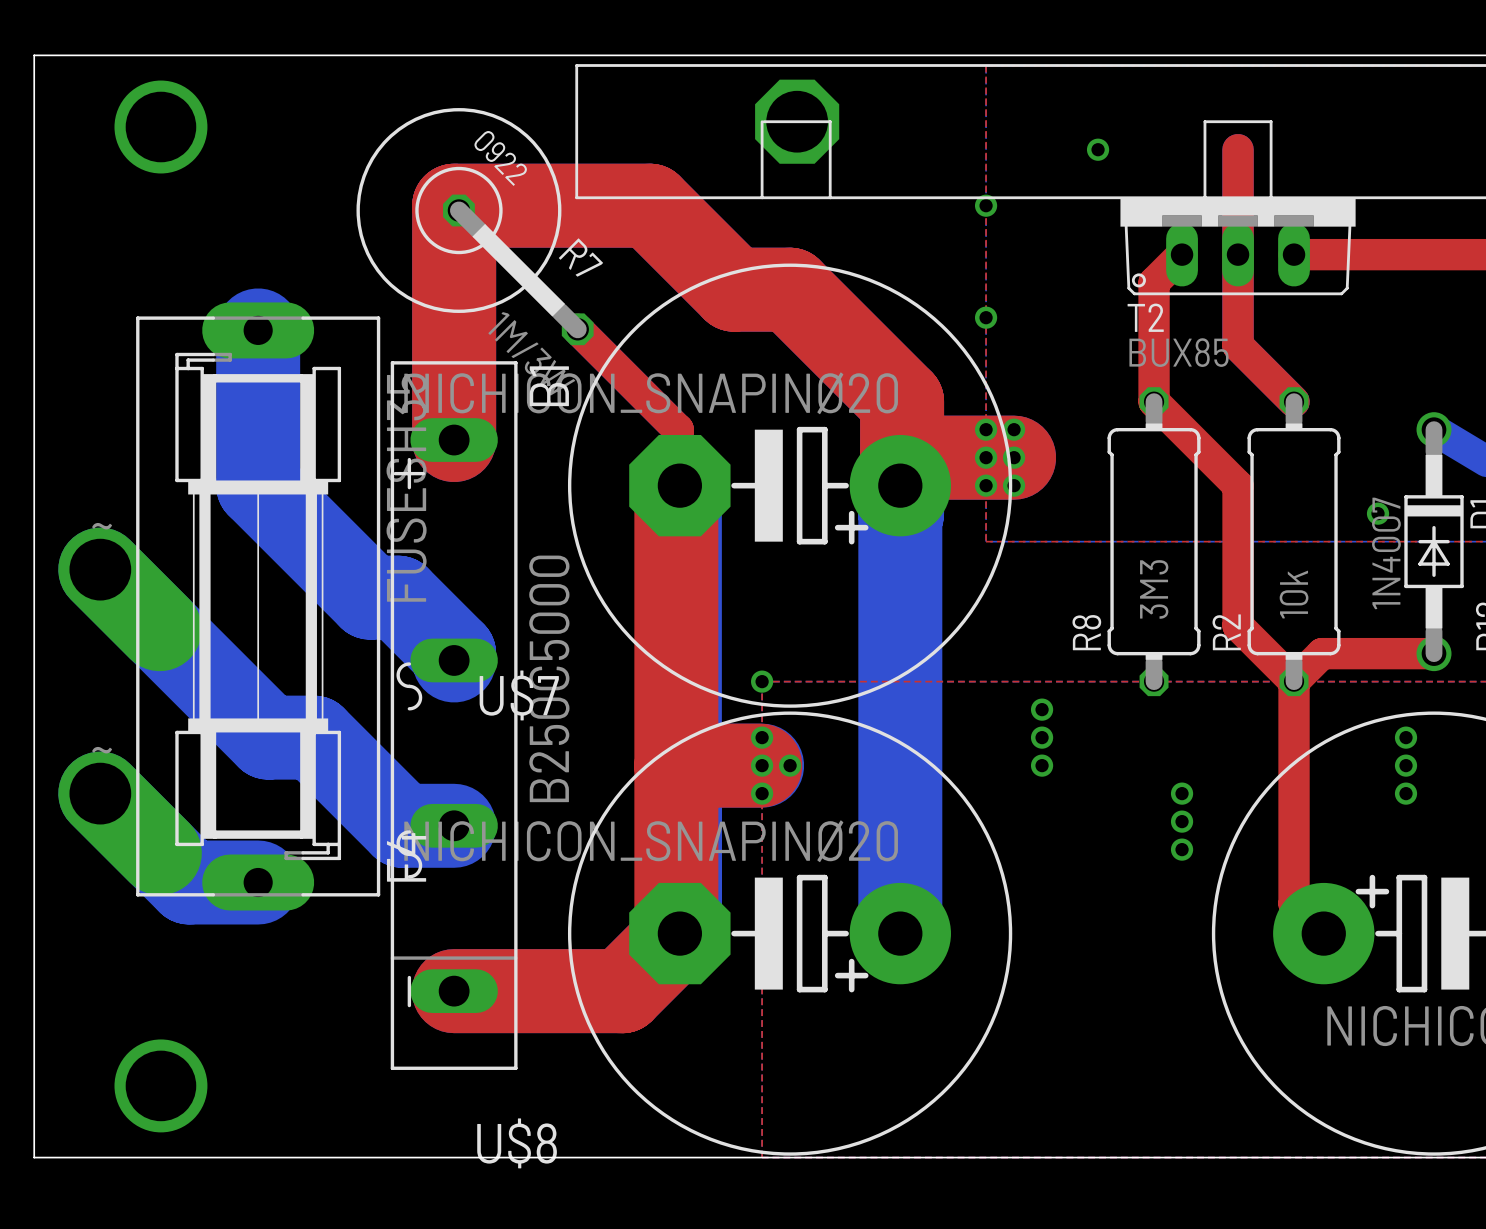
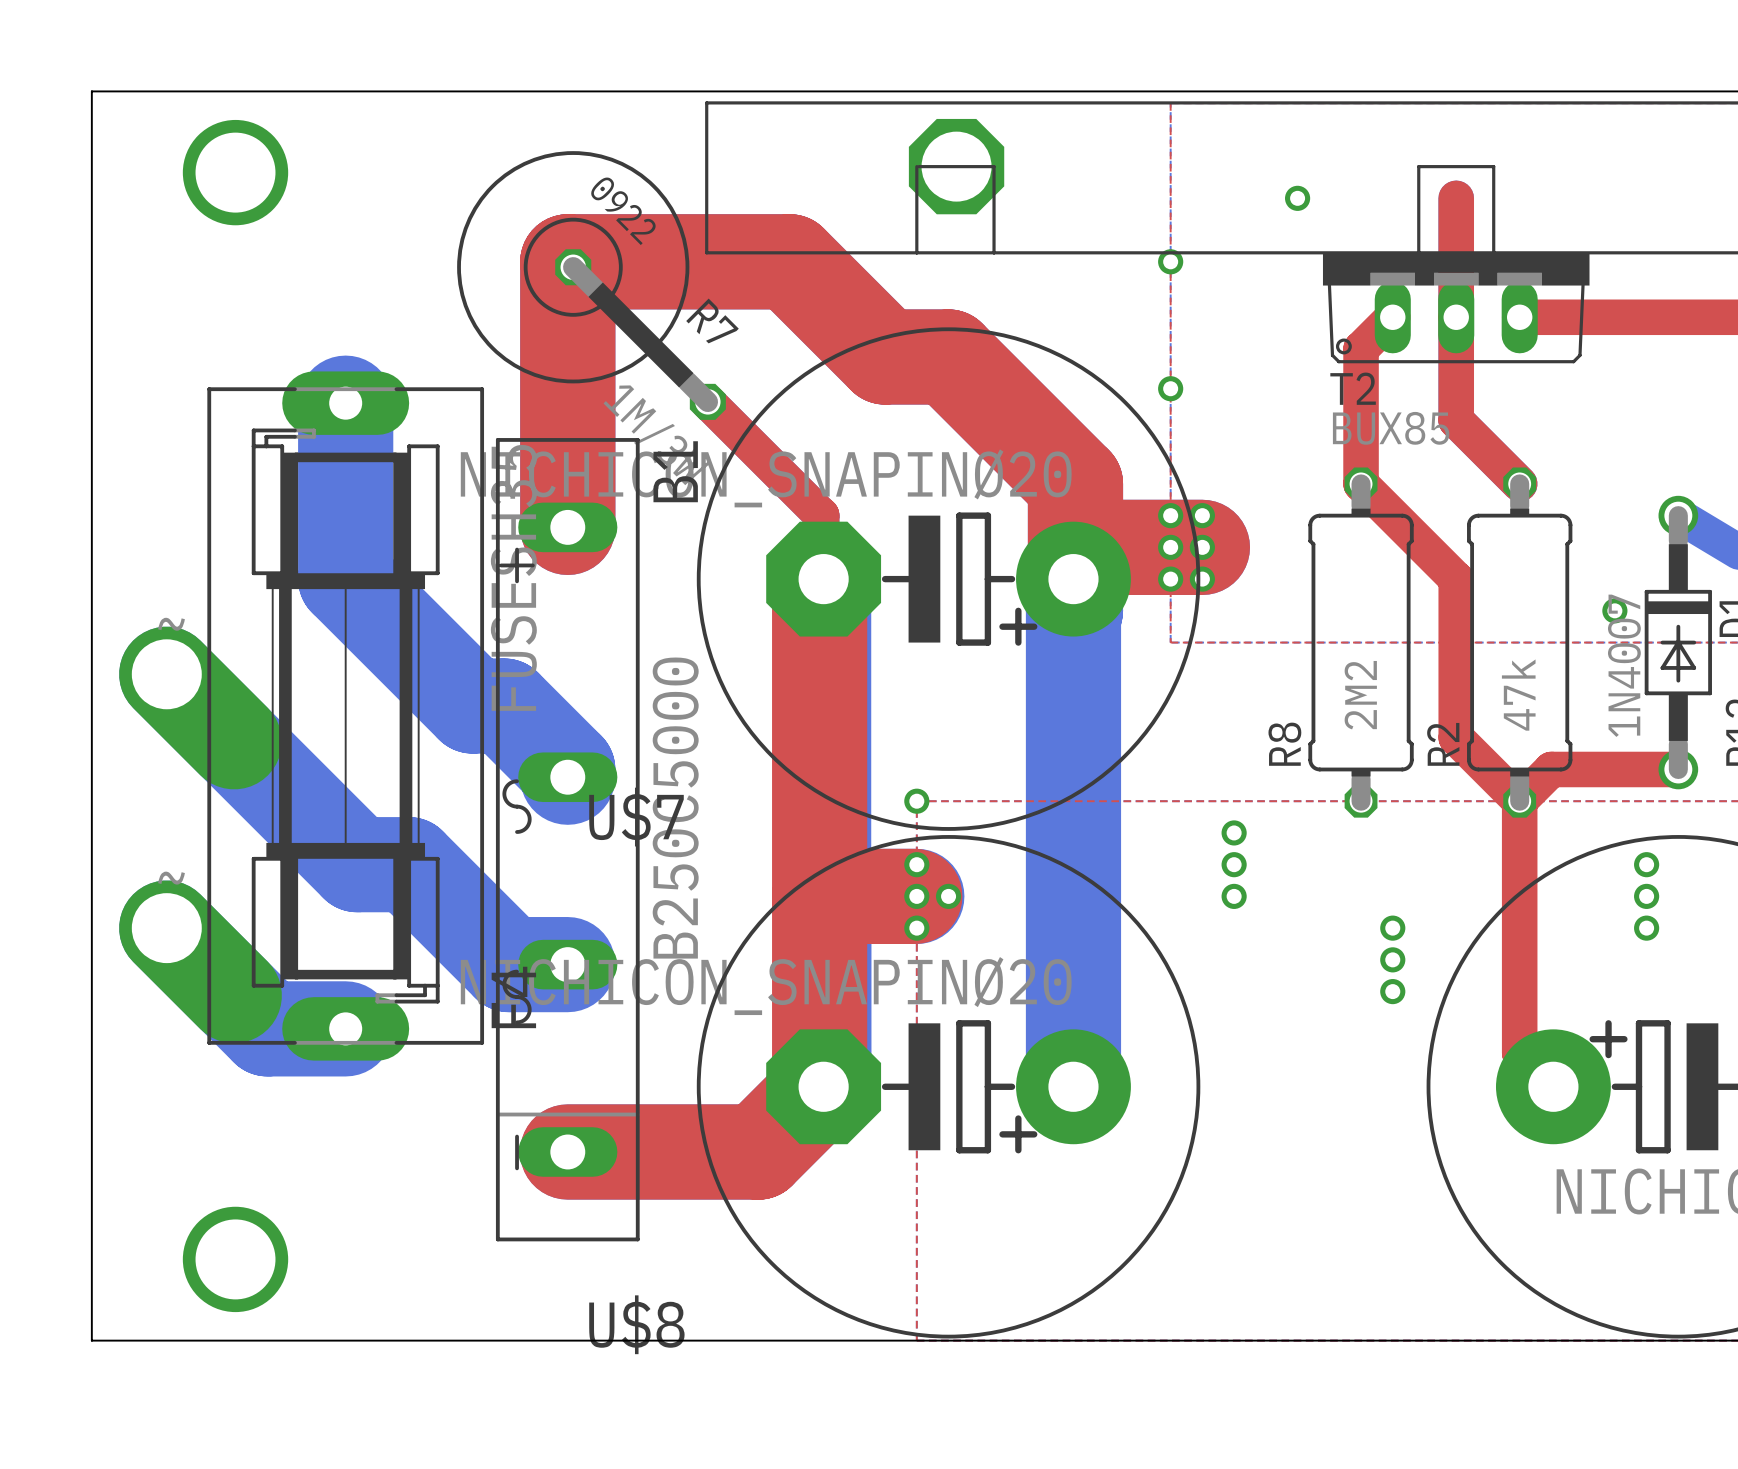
R8 value: 3M3 (1154, 589) -> 2M2 (1360, 695)
R2 value: 10k (1294, 594) -> 47k (1518, 695)

